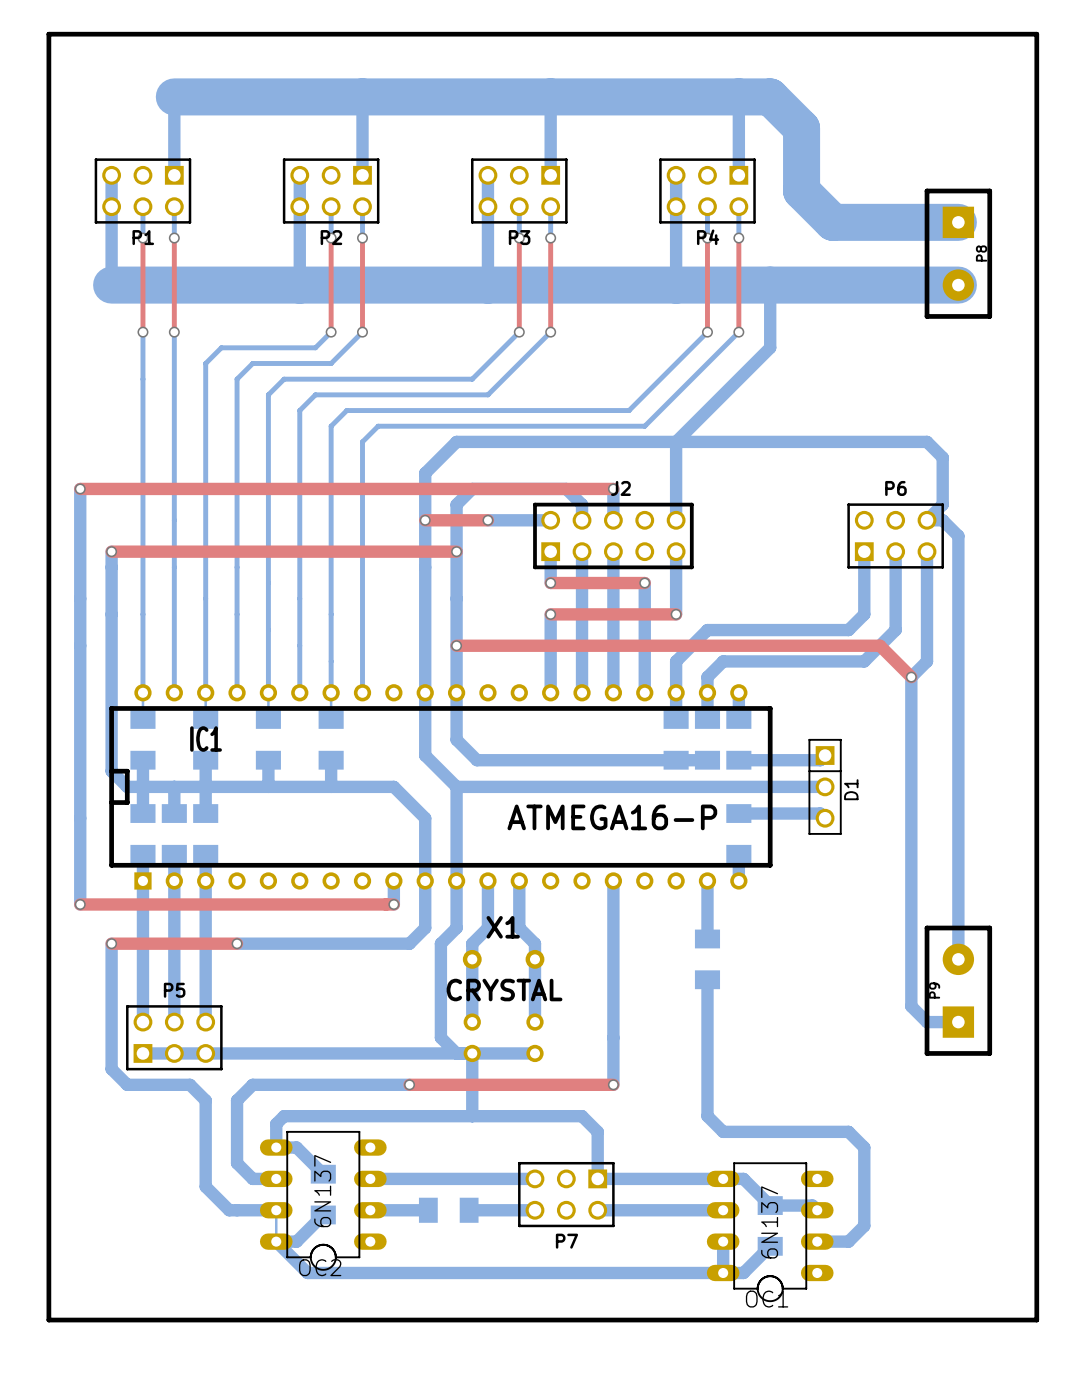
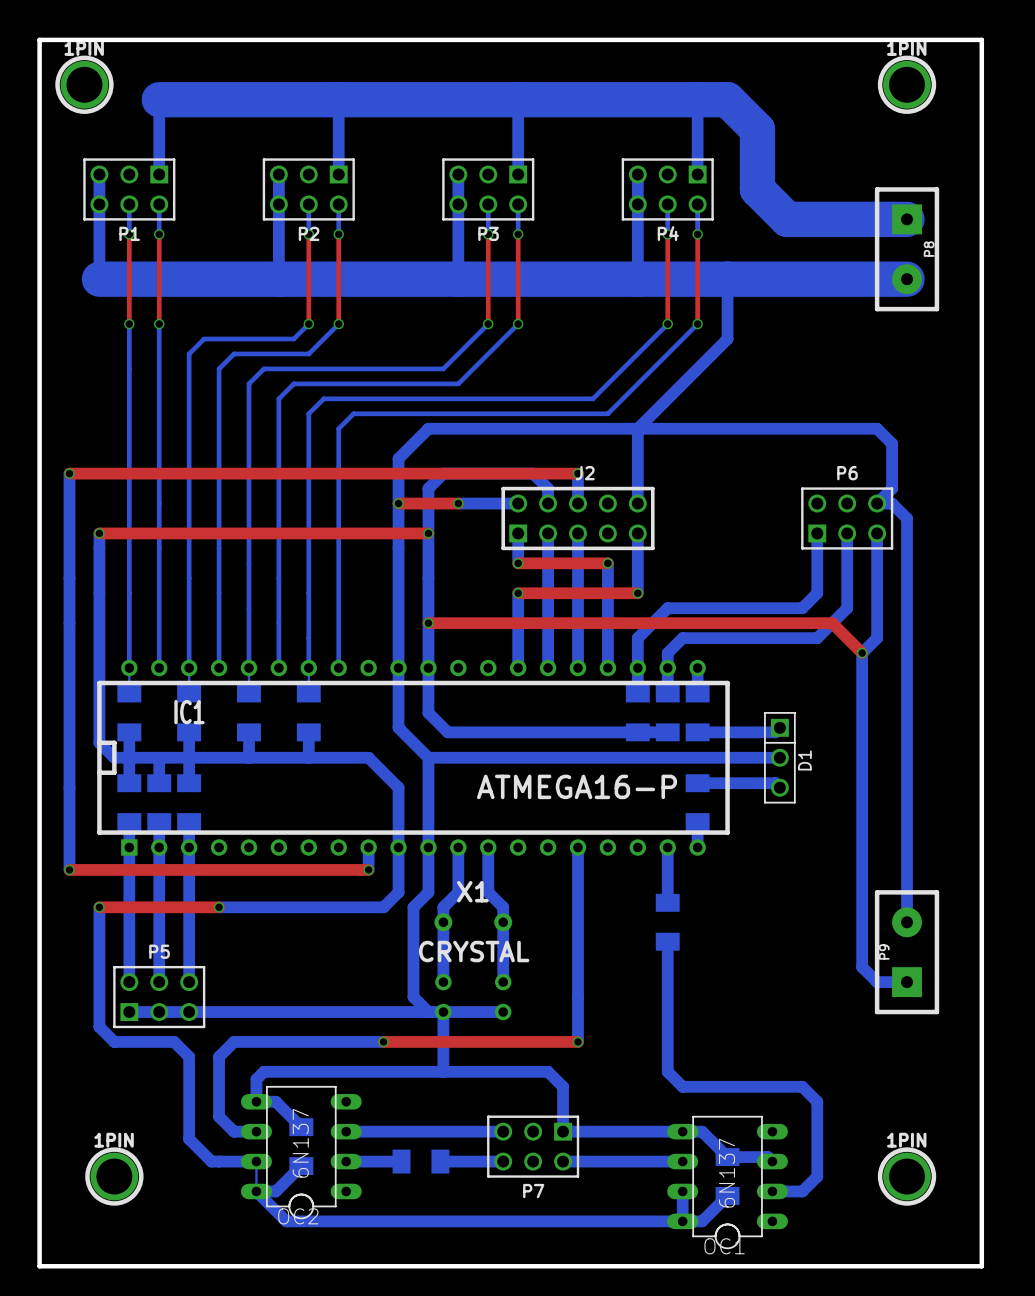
1PIN: none -> (84, 84)
1PIN: none -> (907, 84)
1PIN: none -> (114, 1176)
1PIN: none -> (907, 1176)

